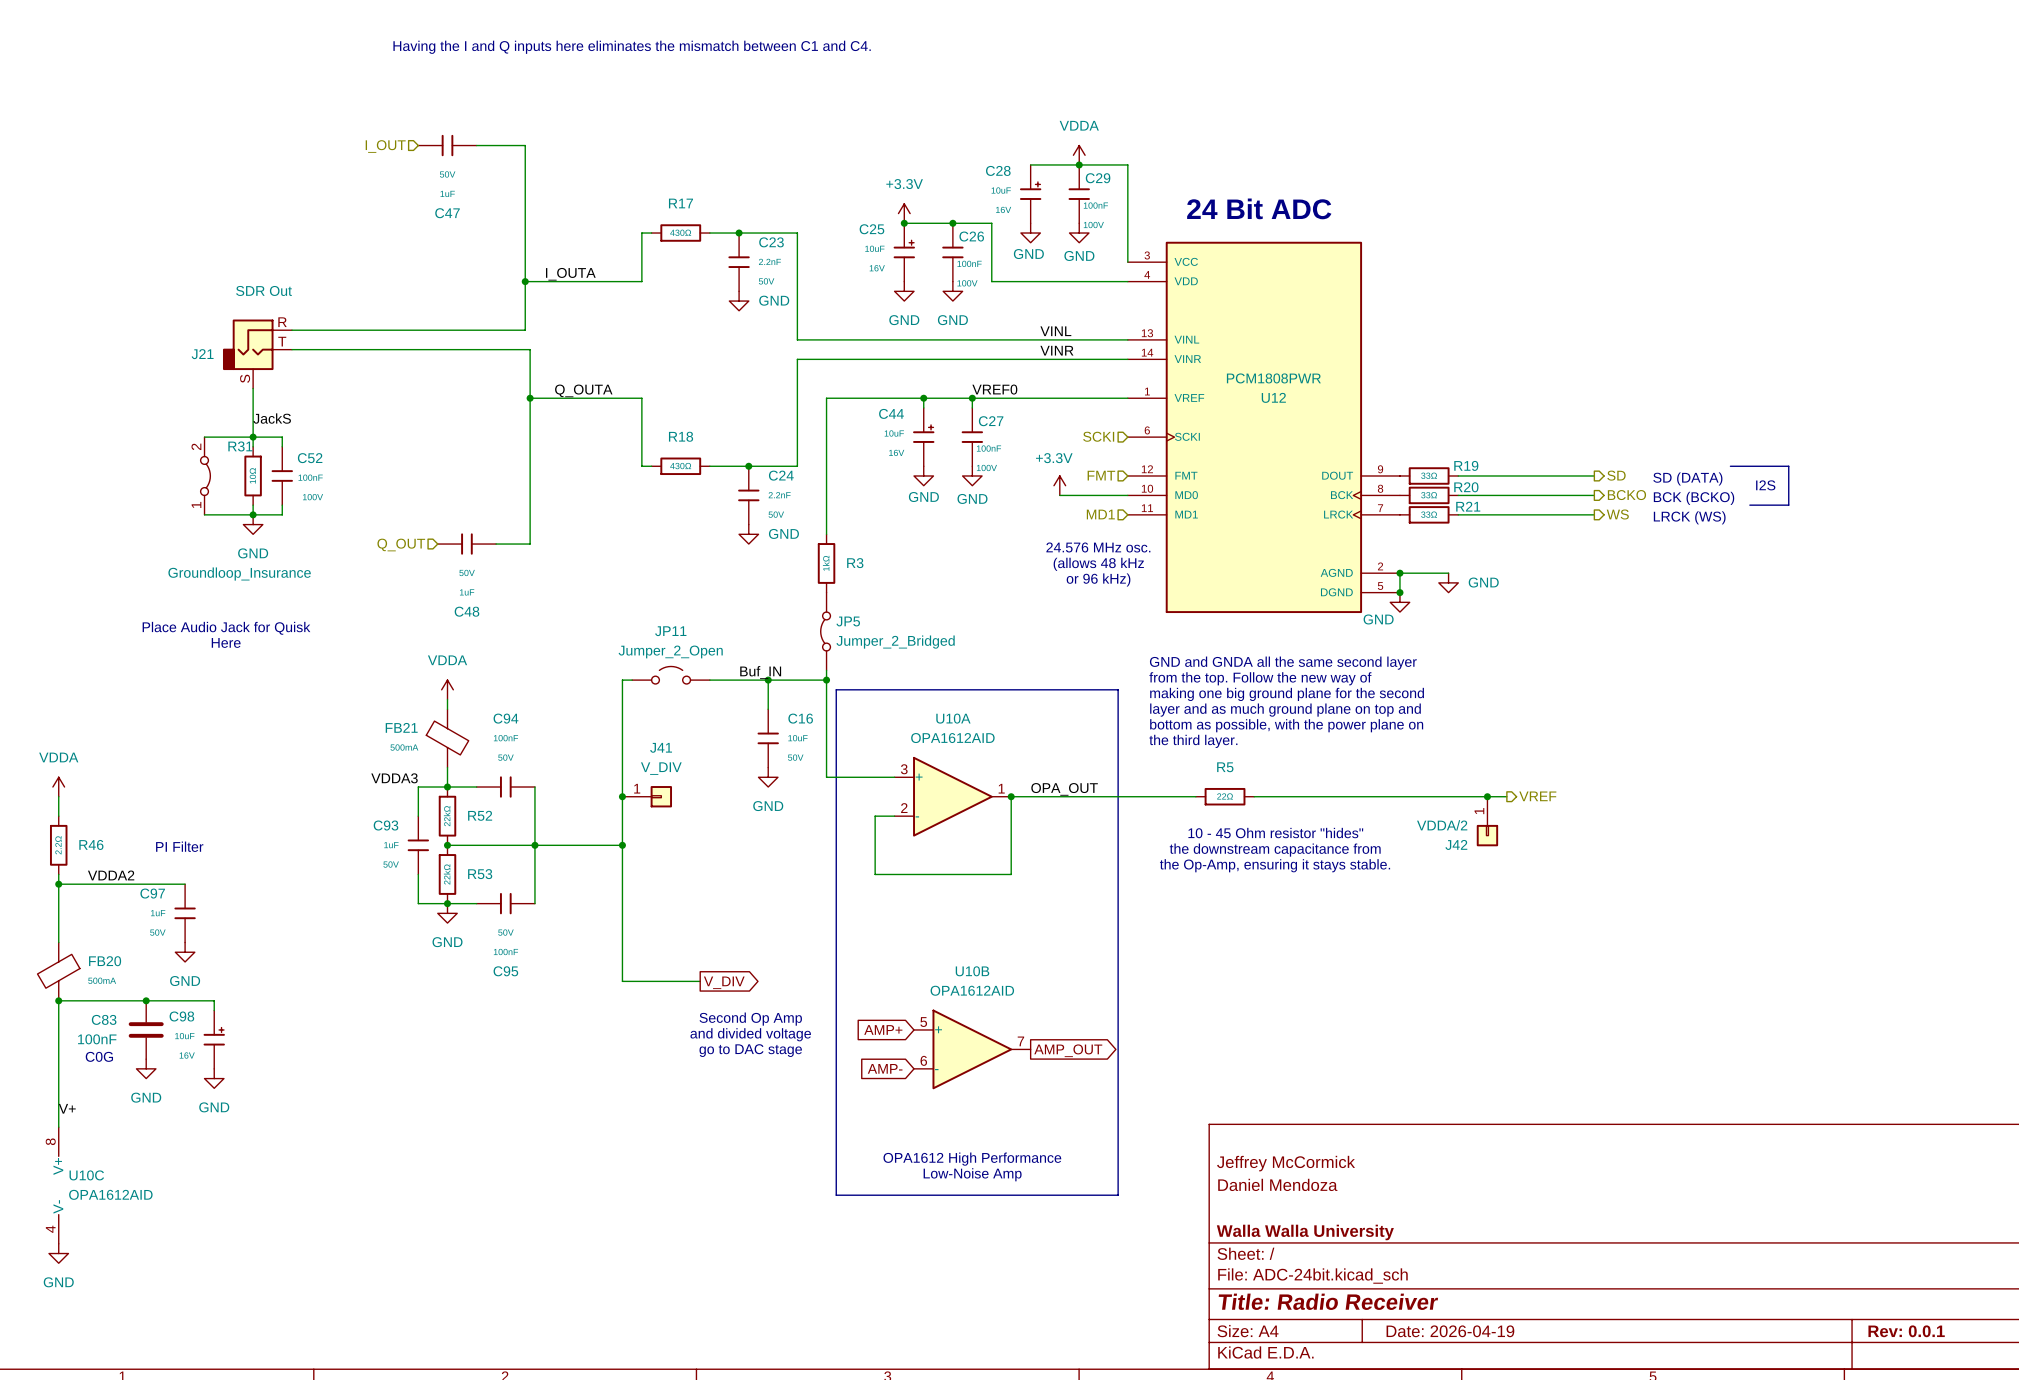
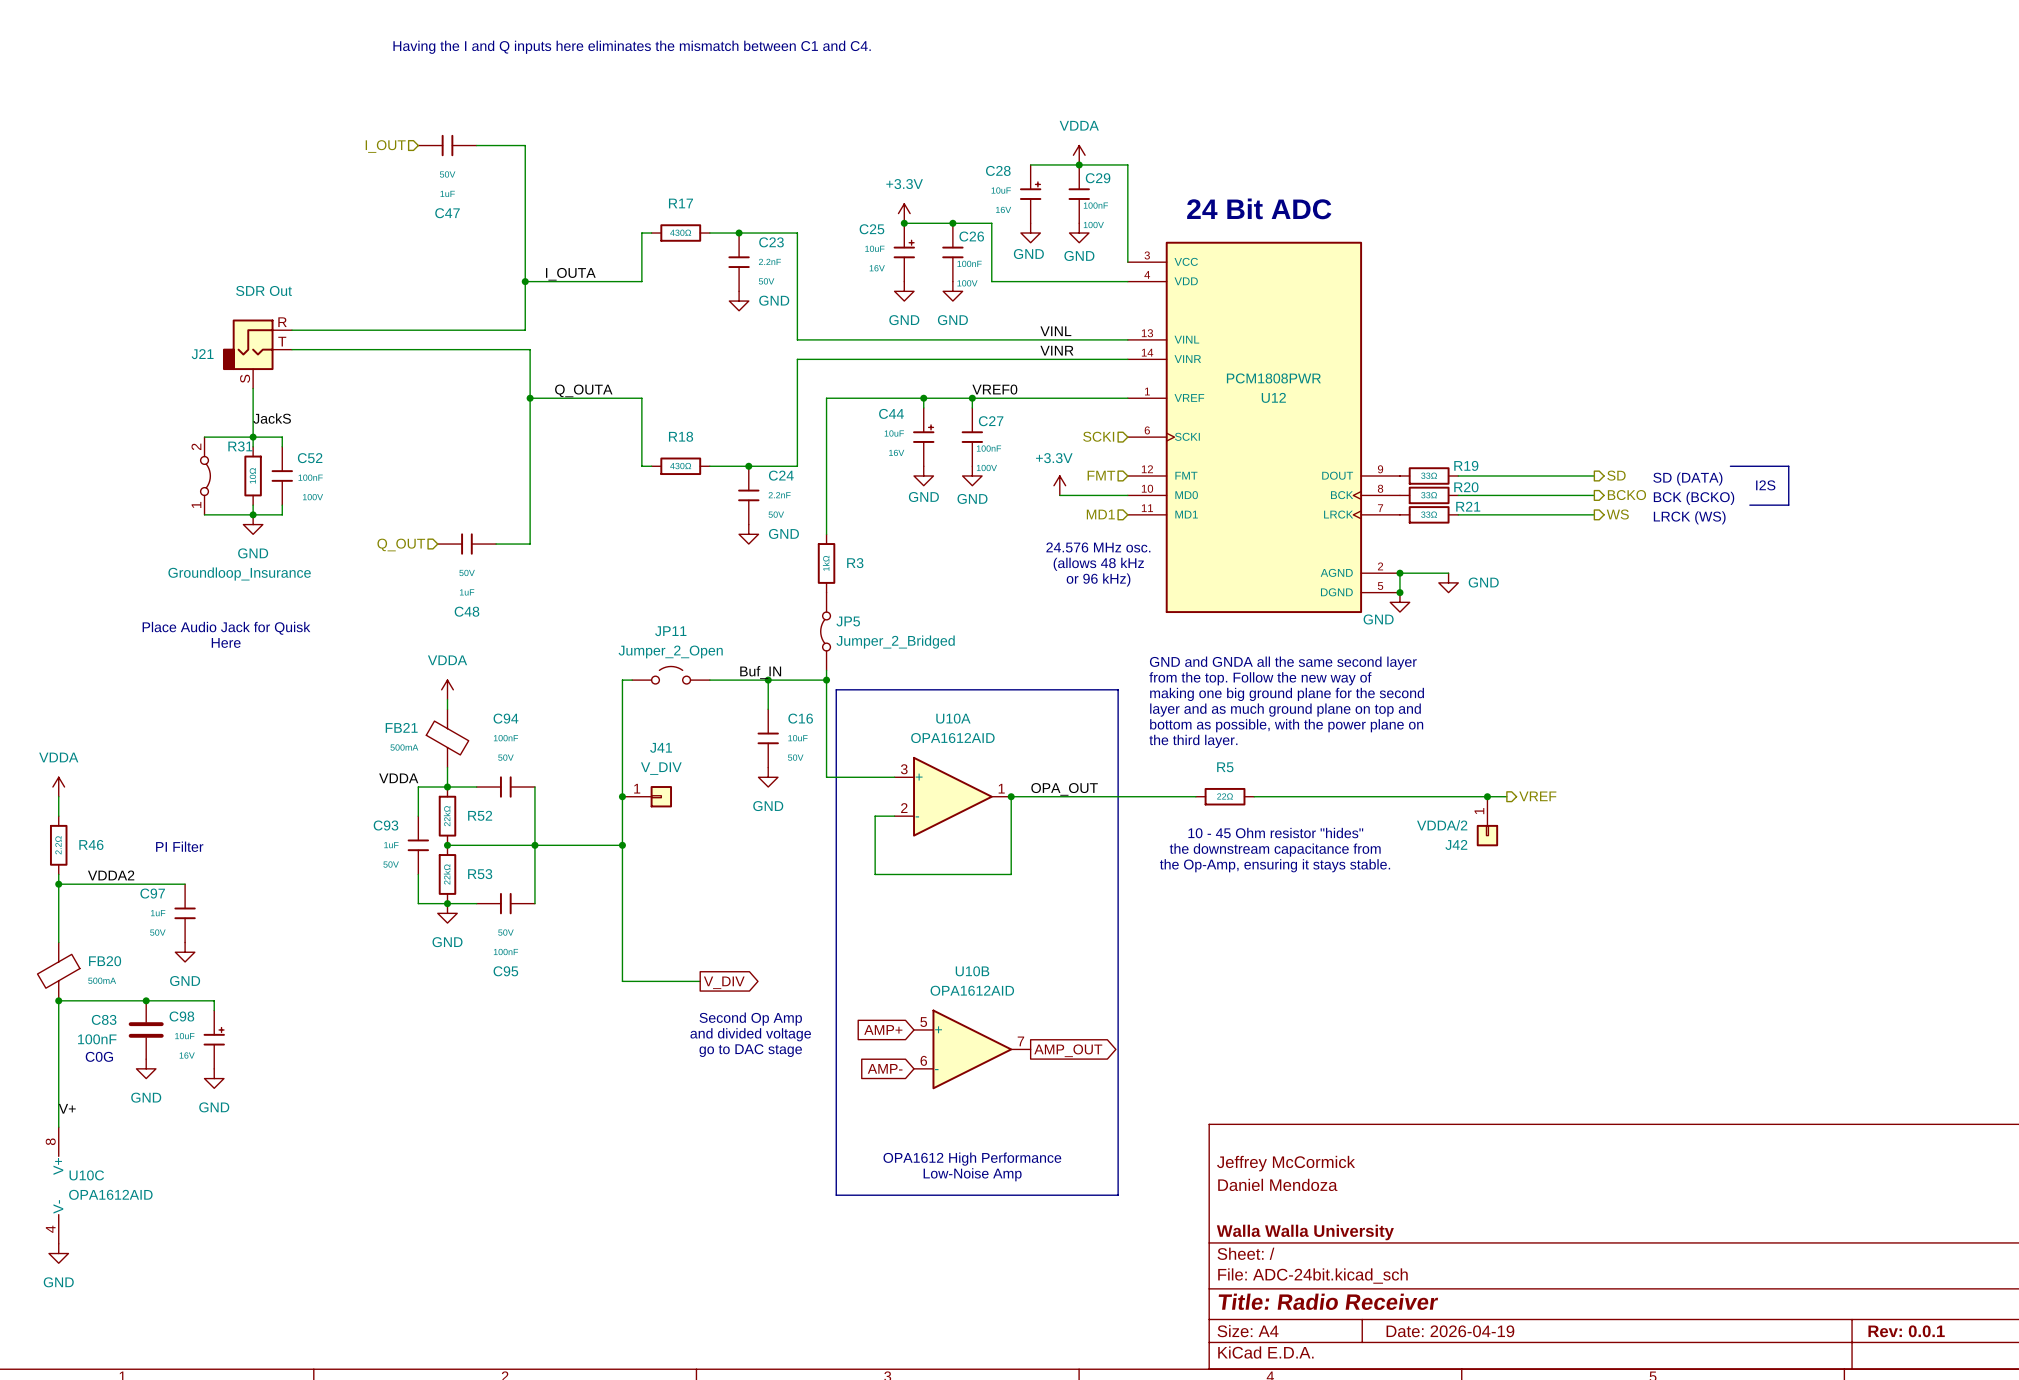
label: VDDA3 (394, 778) -> VDDA (398, 778)

